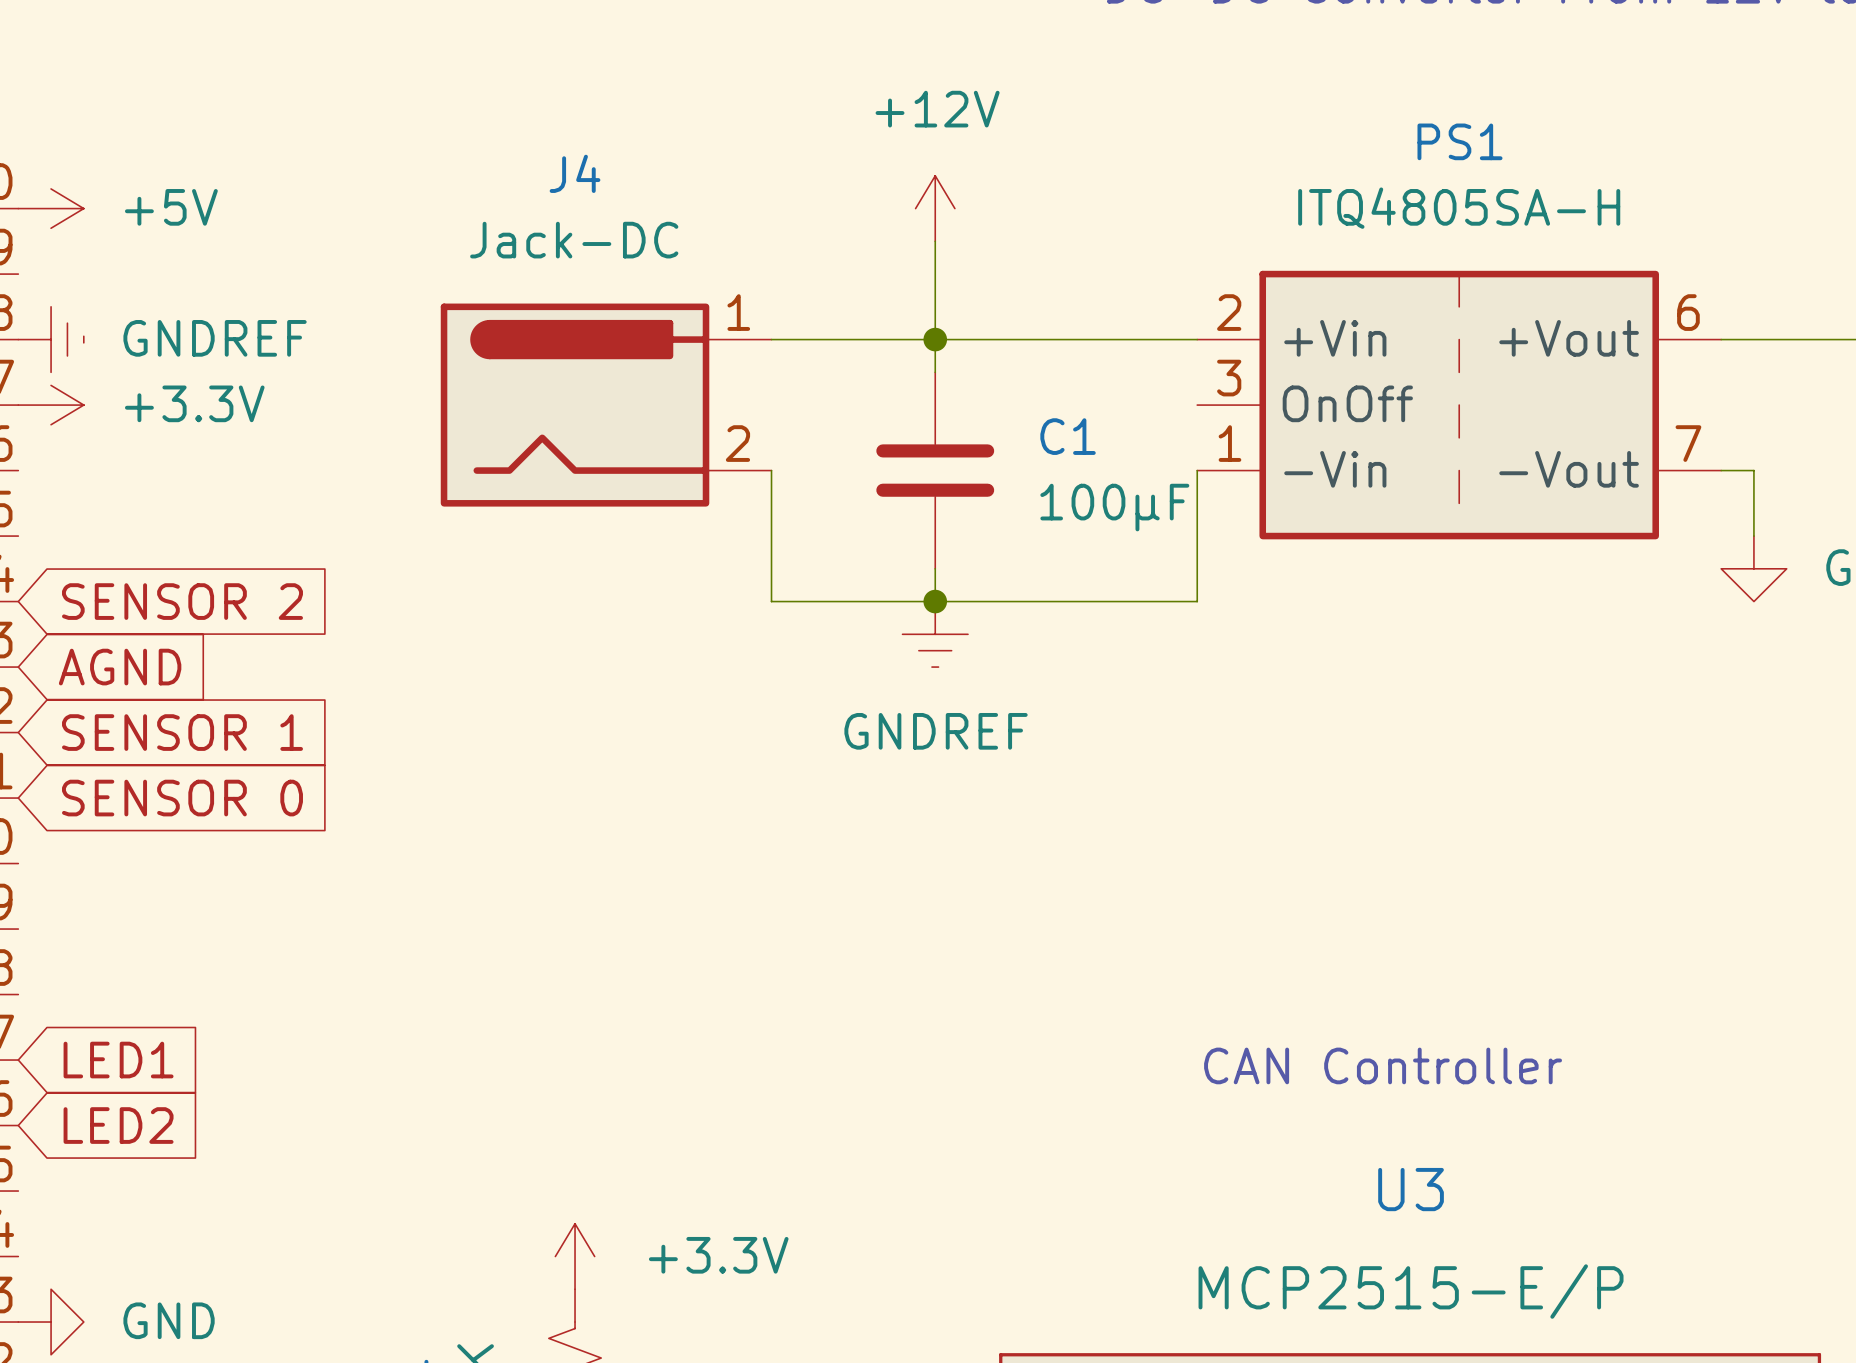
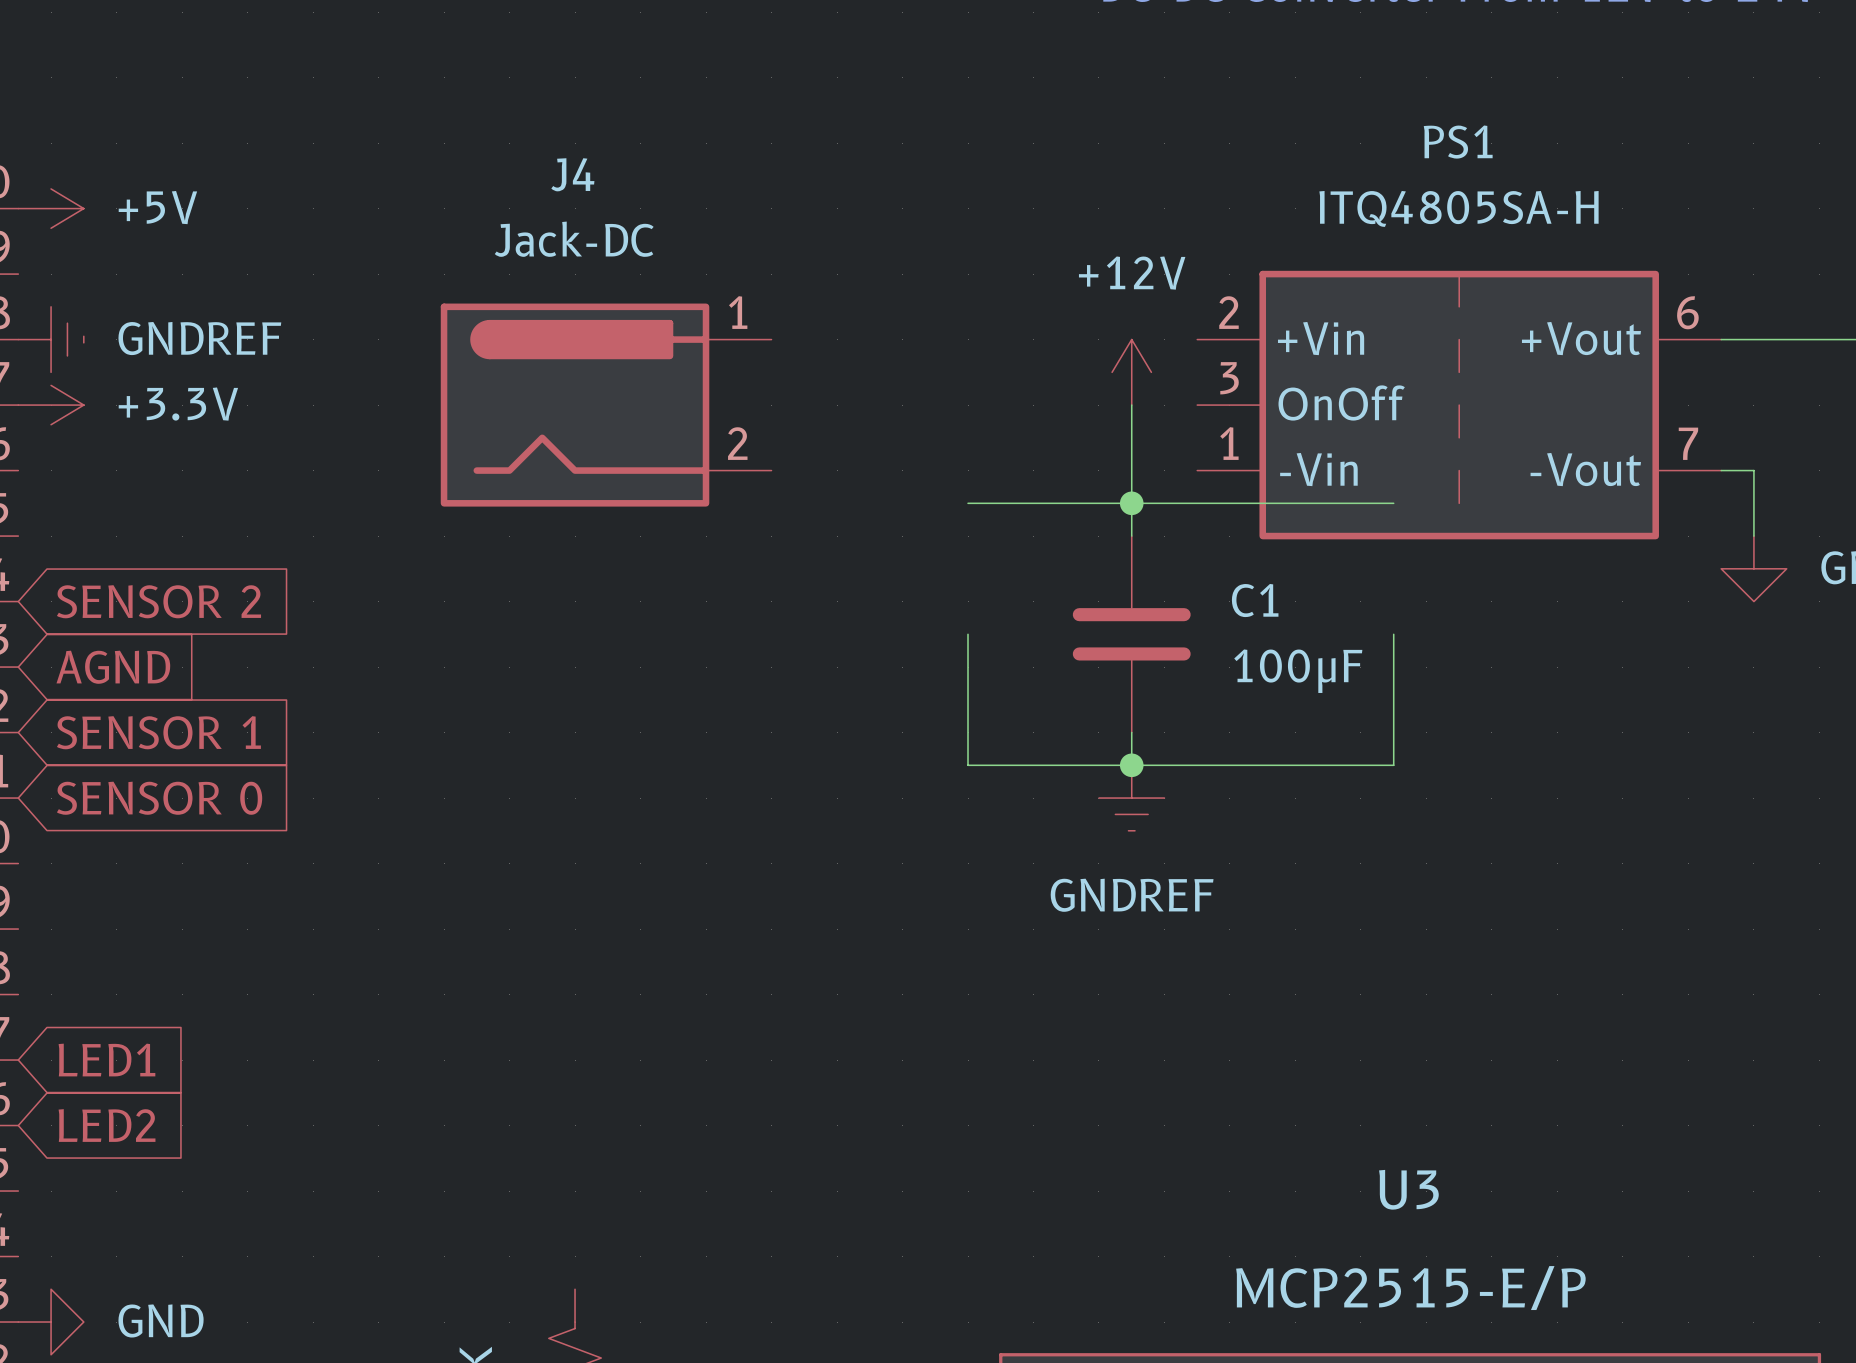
power symbol position: +12V (935, 208) -> +12V (1131, 372)
wire: (935, 241) (935, 372) -> (1131, 405) (1131, 536)
wire: (771, 339) (1197, 339) -> (968, 503) (1393, 503)
junction: (935, 339) -> none
wire: (771, 470) (771, 601) (1197, 601) (1197, 470) -> (968, 634) (968, 765) (1393, 765) (1393, 634)
C1 position: (935, 470) -> (1131, 634)
junction: none -> (1131, 503)
wire: (935, 568) (935, 601) -> (1131, 732) (1131, 765)
junction: (935, 601) -> none
power symbol position: GNDREF (935, 634) -> GNDREF (1131, 798)
junction: none -> (1131, 765)
text: CAN Controller (1383, 1065) -> none
power symbol: +3.3V (575, 1256) -> none

